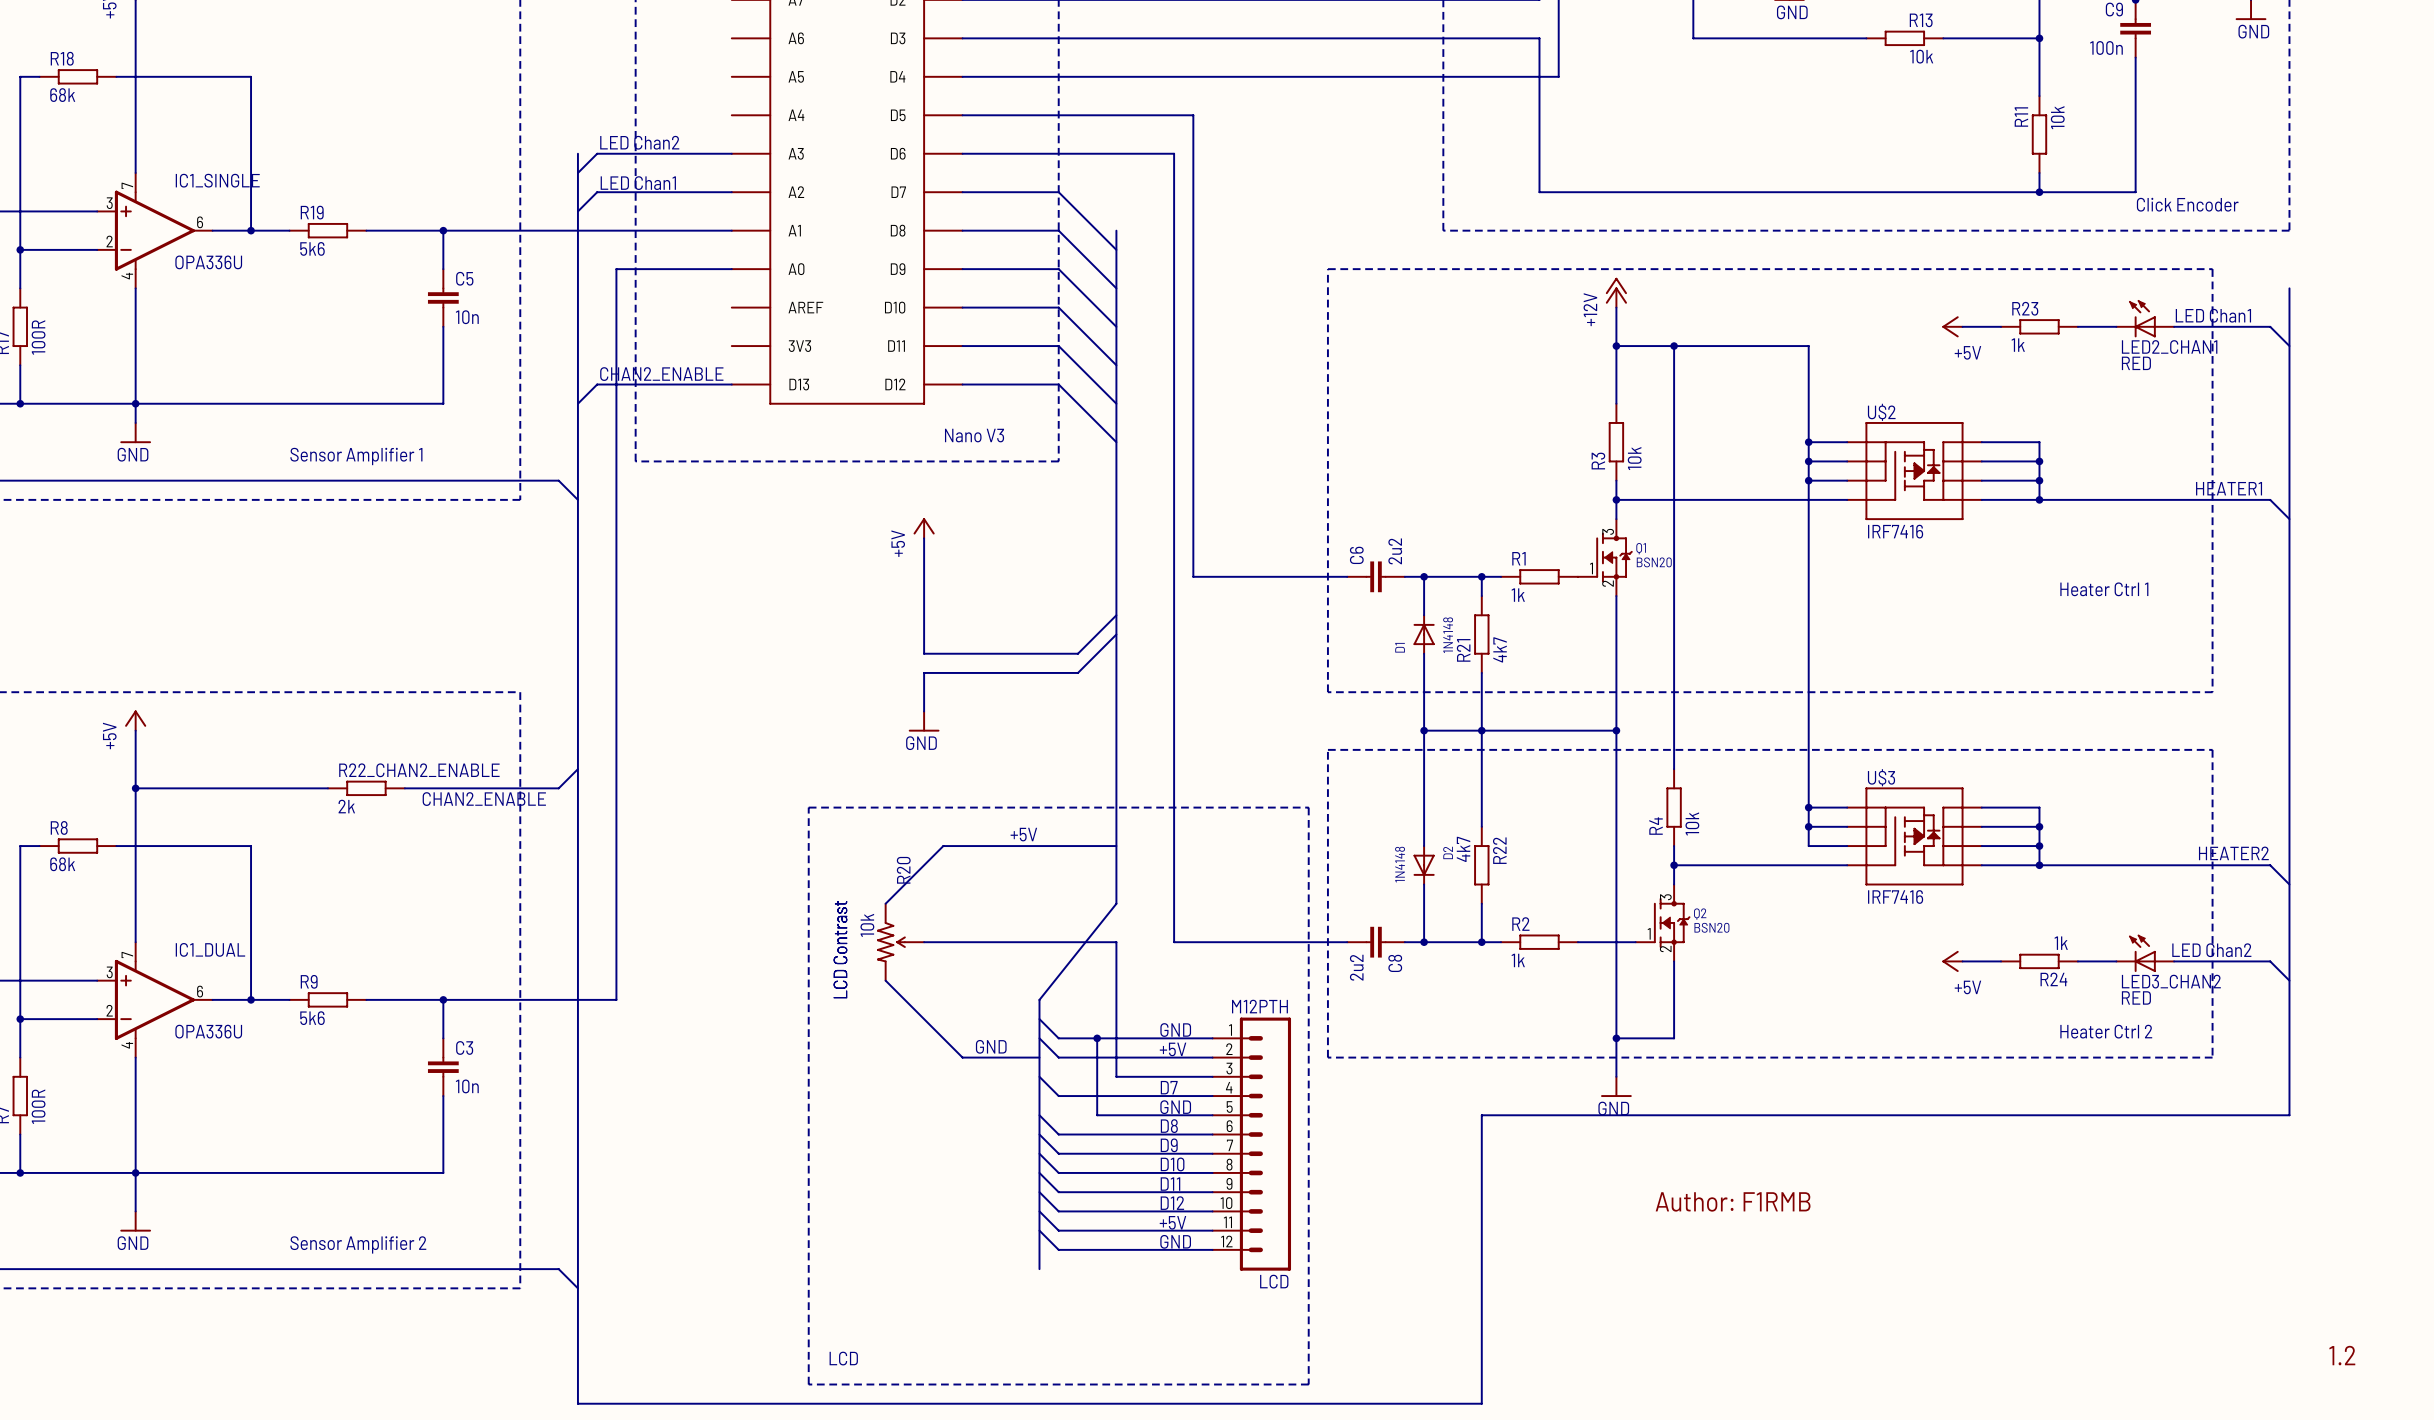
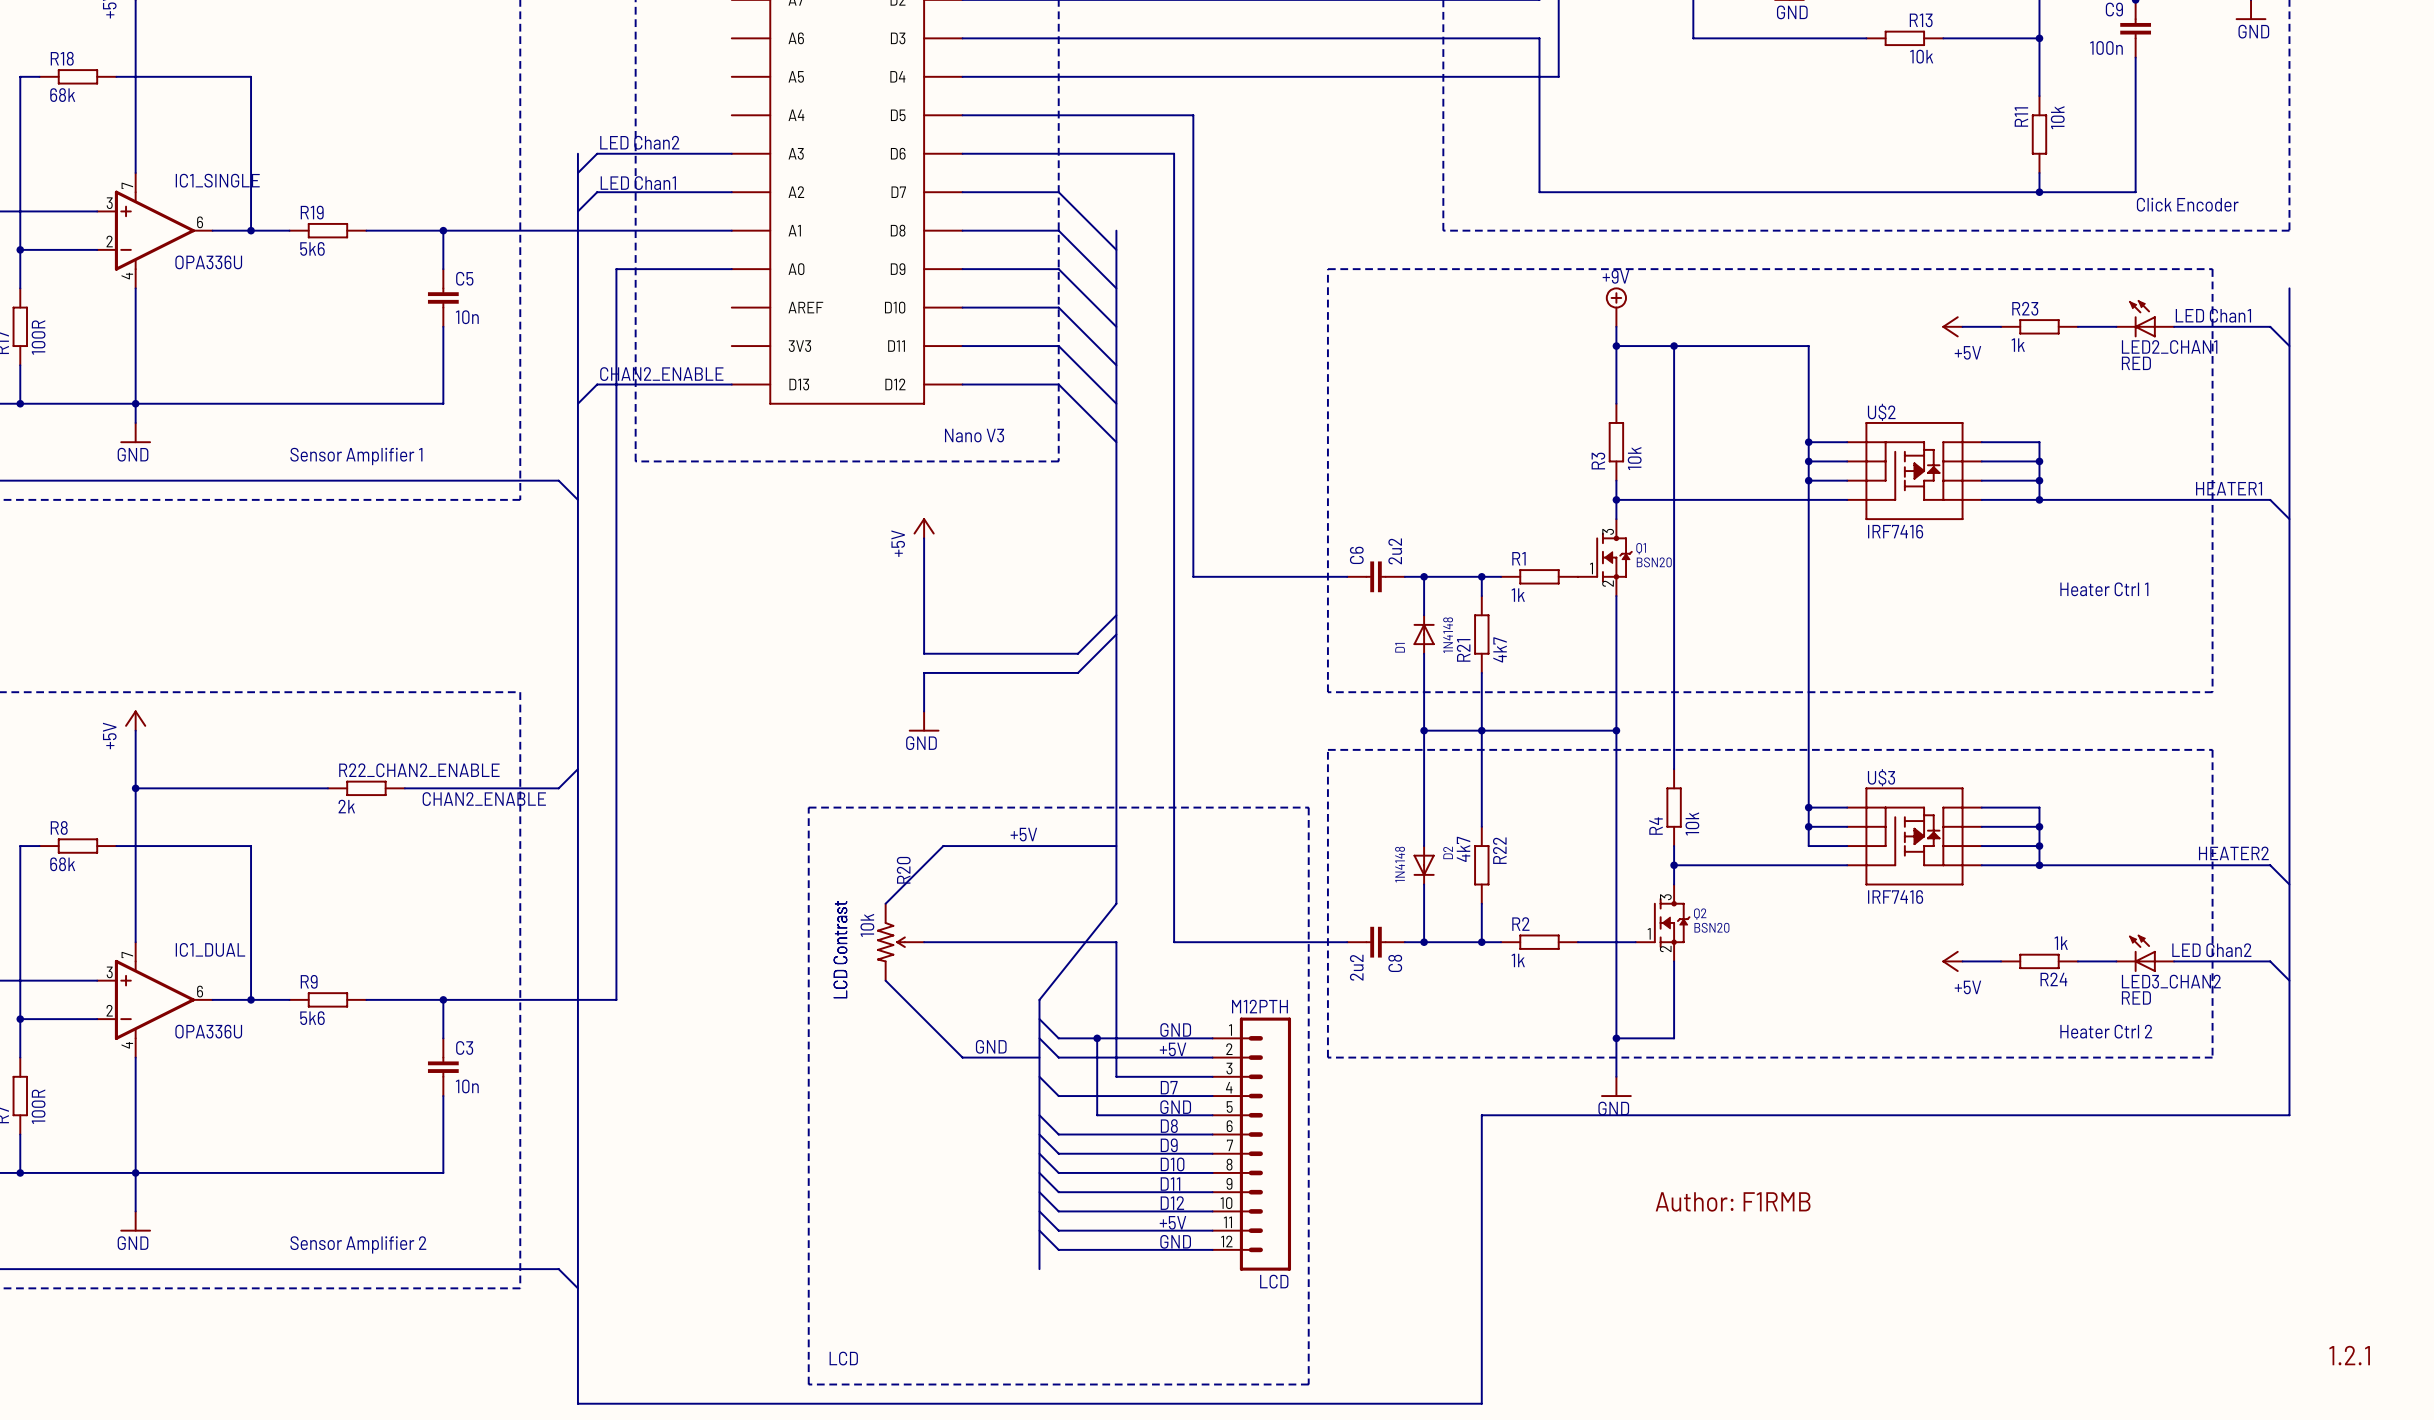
power symbol: +12V (1616, 292) -> none
power symbol: none -> +9V (1616, 307)
text: 1.2 (2342, 1355) -> 1.2.1 (2349, 1355)

